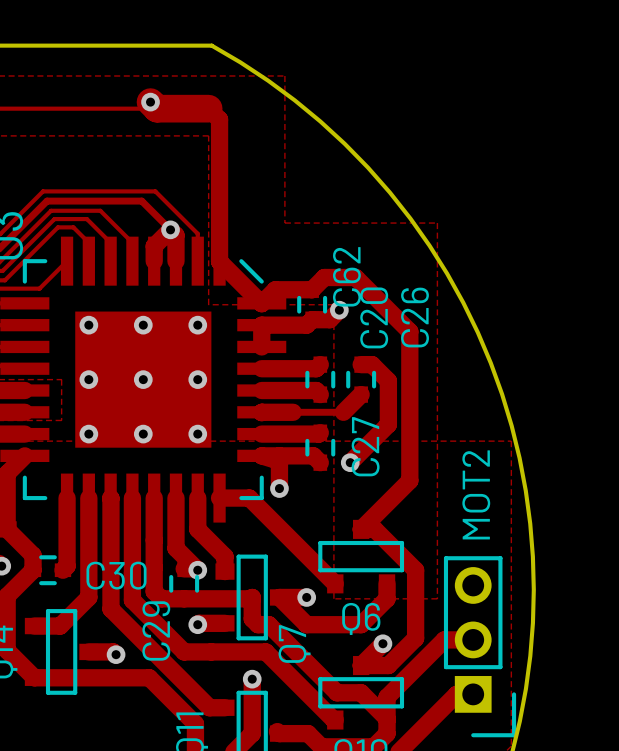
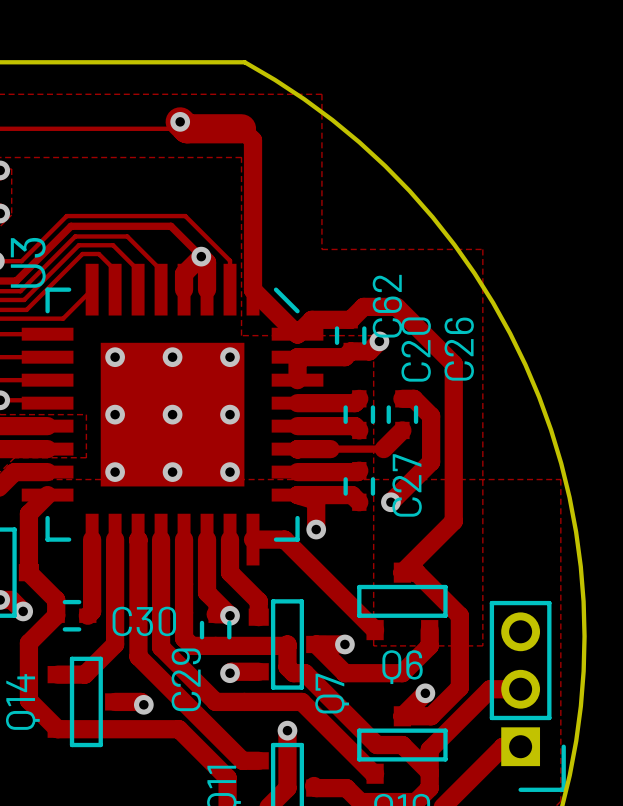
part value: MOT2 (476, 494) -> none

